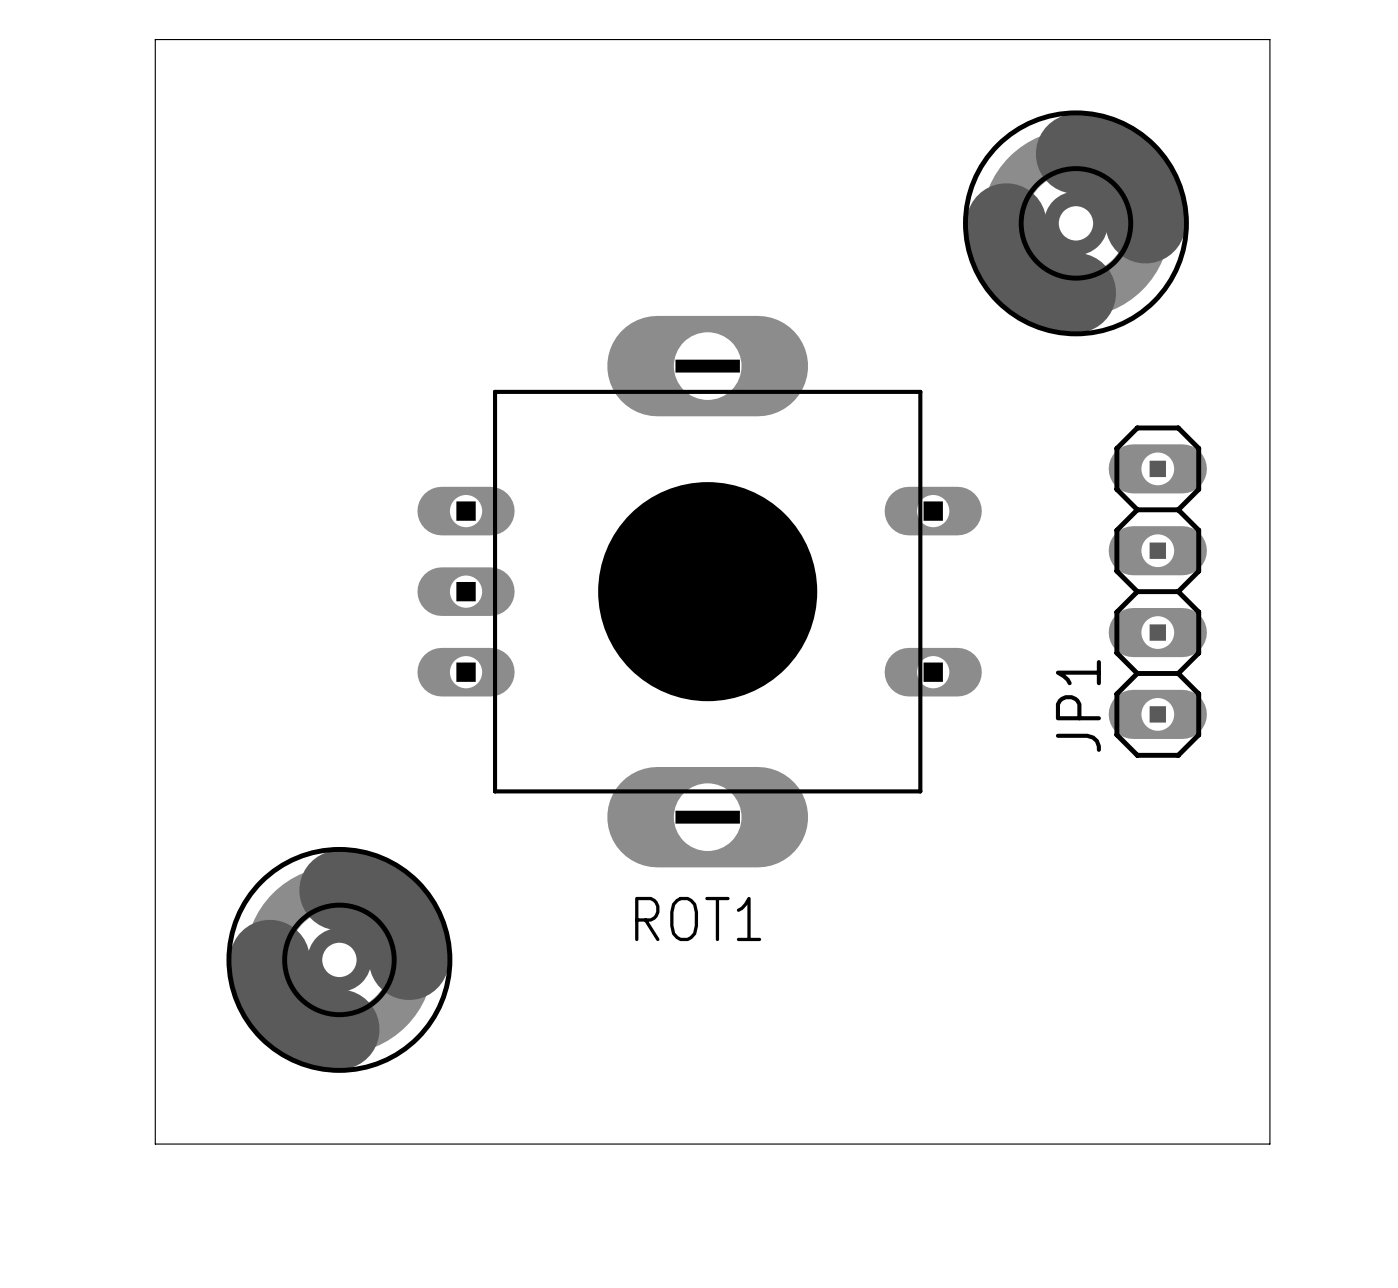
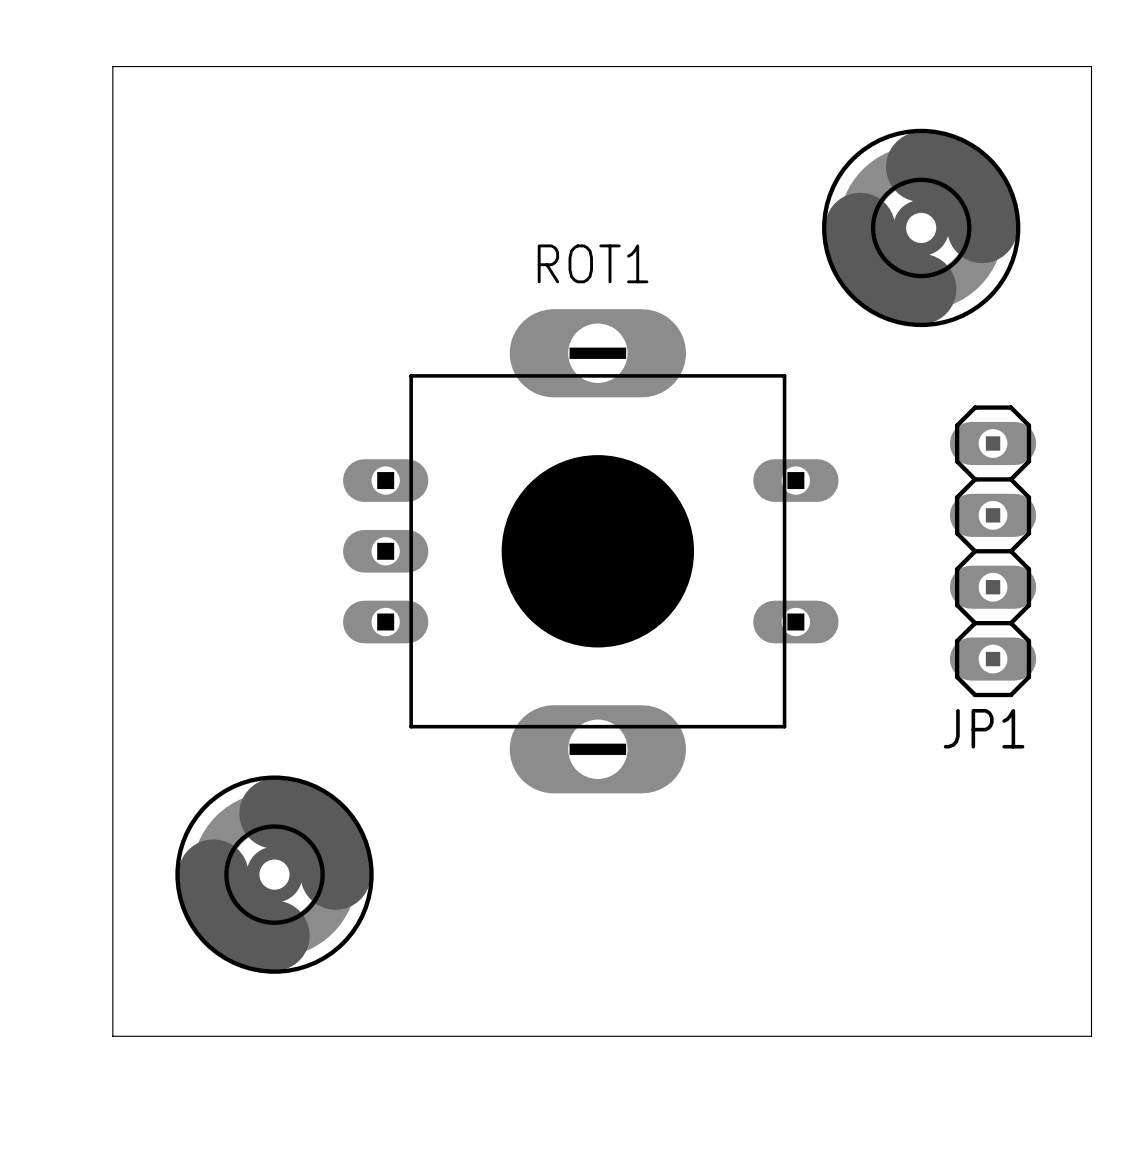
JP1 name rotation: 0° (1078, 705) -> 90° clockwise (984, 728)
ROT1 name position: ROT1 (698, 918) -> ROT1 (593, 263)

